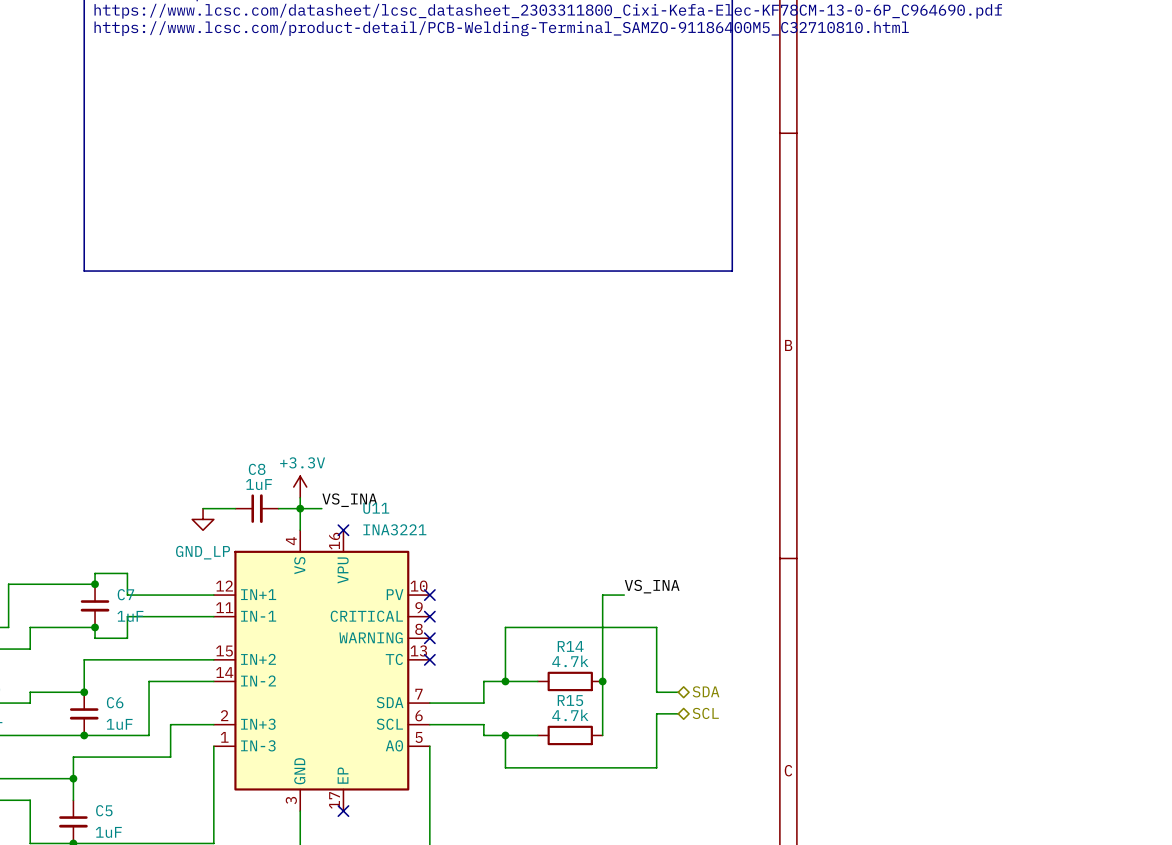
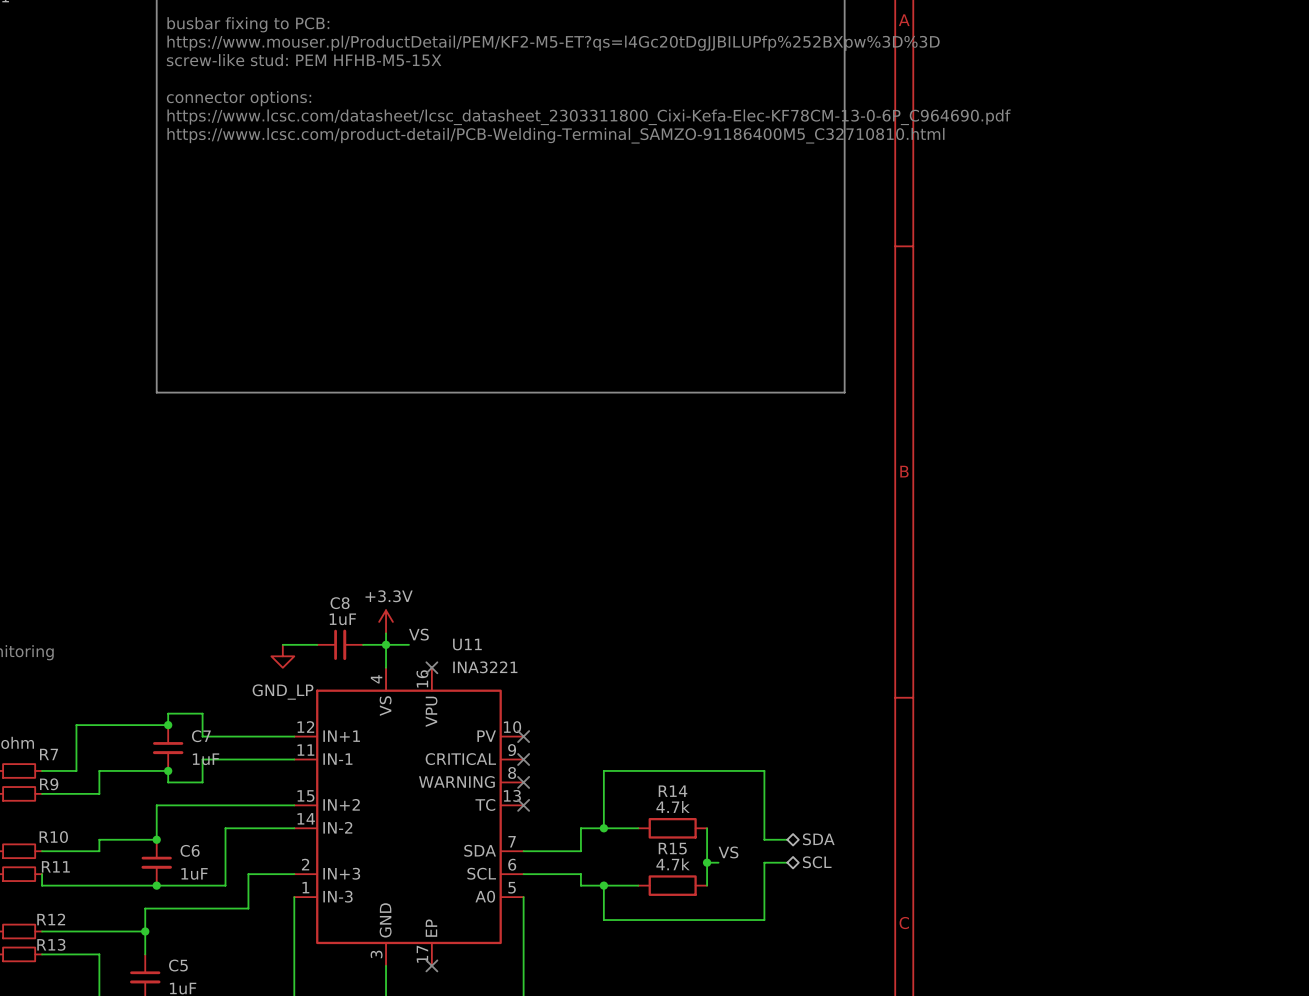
label: VS_INA (349, 500) -> VS (418, 634)
label: VS_INA (652, 586) -> none
wire: (624, 595) (602, 595) (602, 681) -> none
junction position: (602, 681) -> (707, 862)
label: none -> VS (728, 852)
wire: none -> (707, 862) (718, 862)

